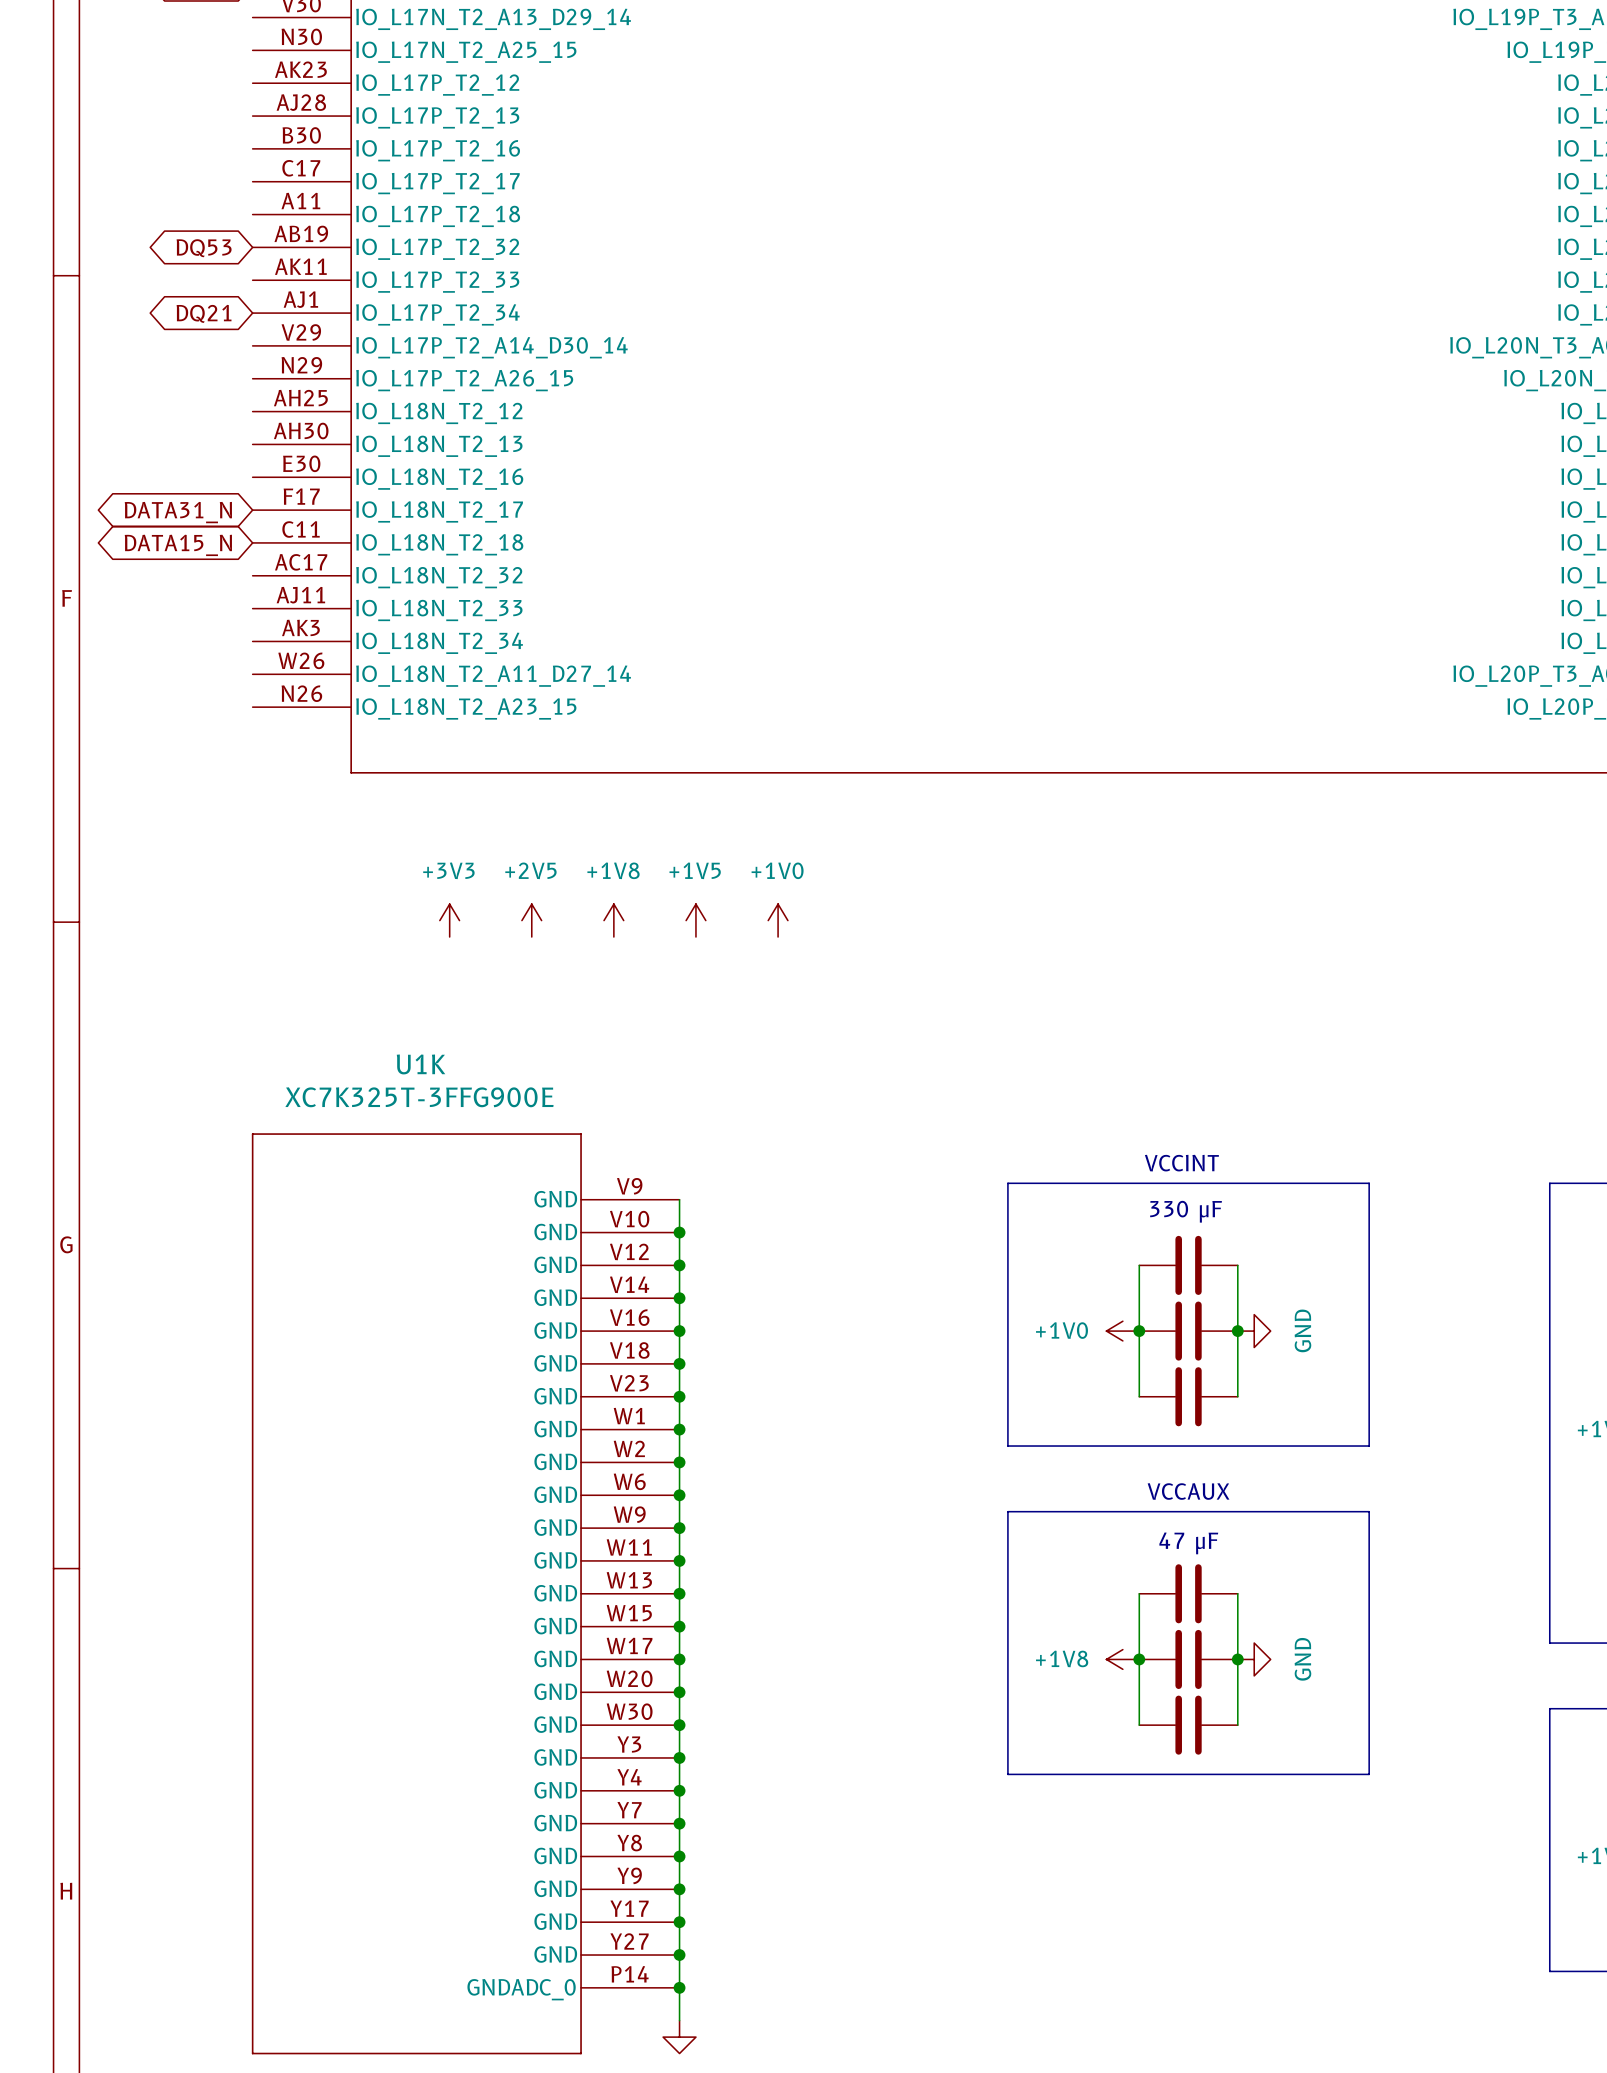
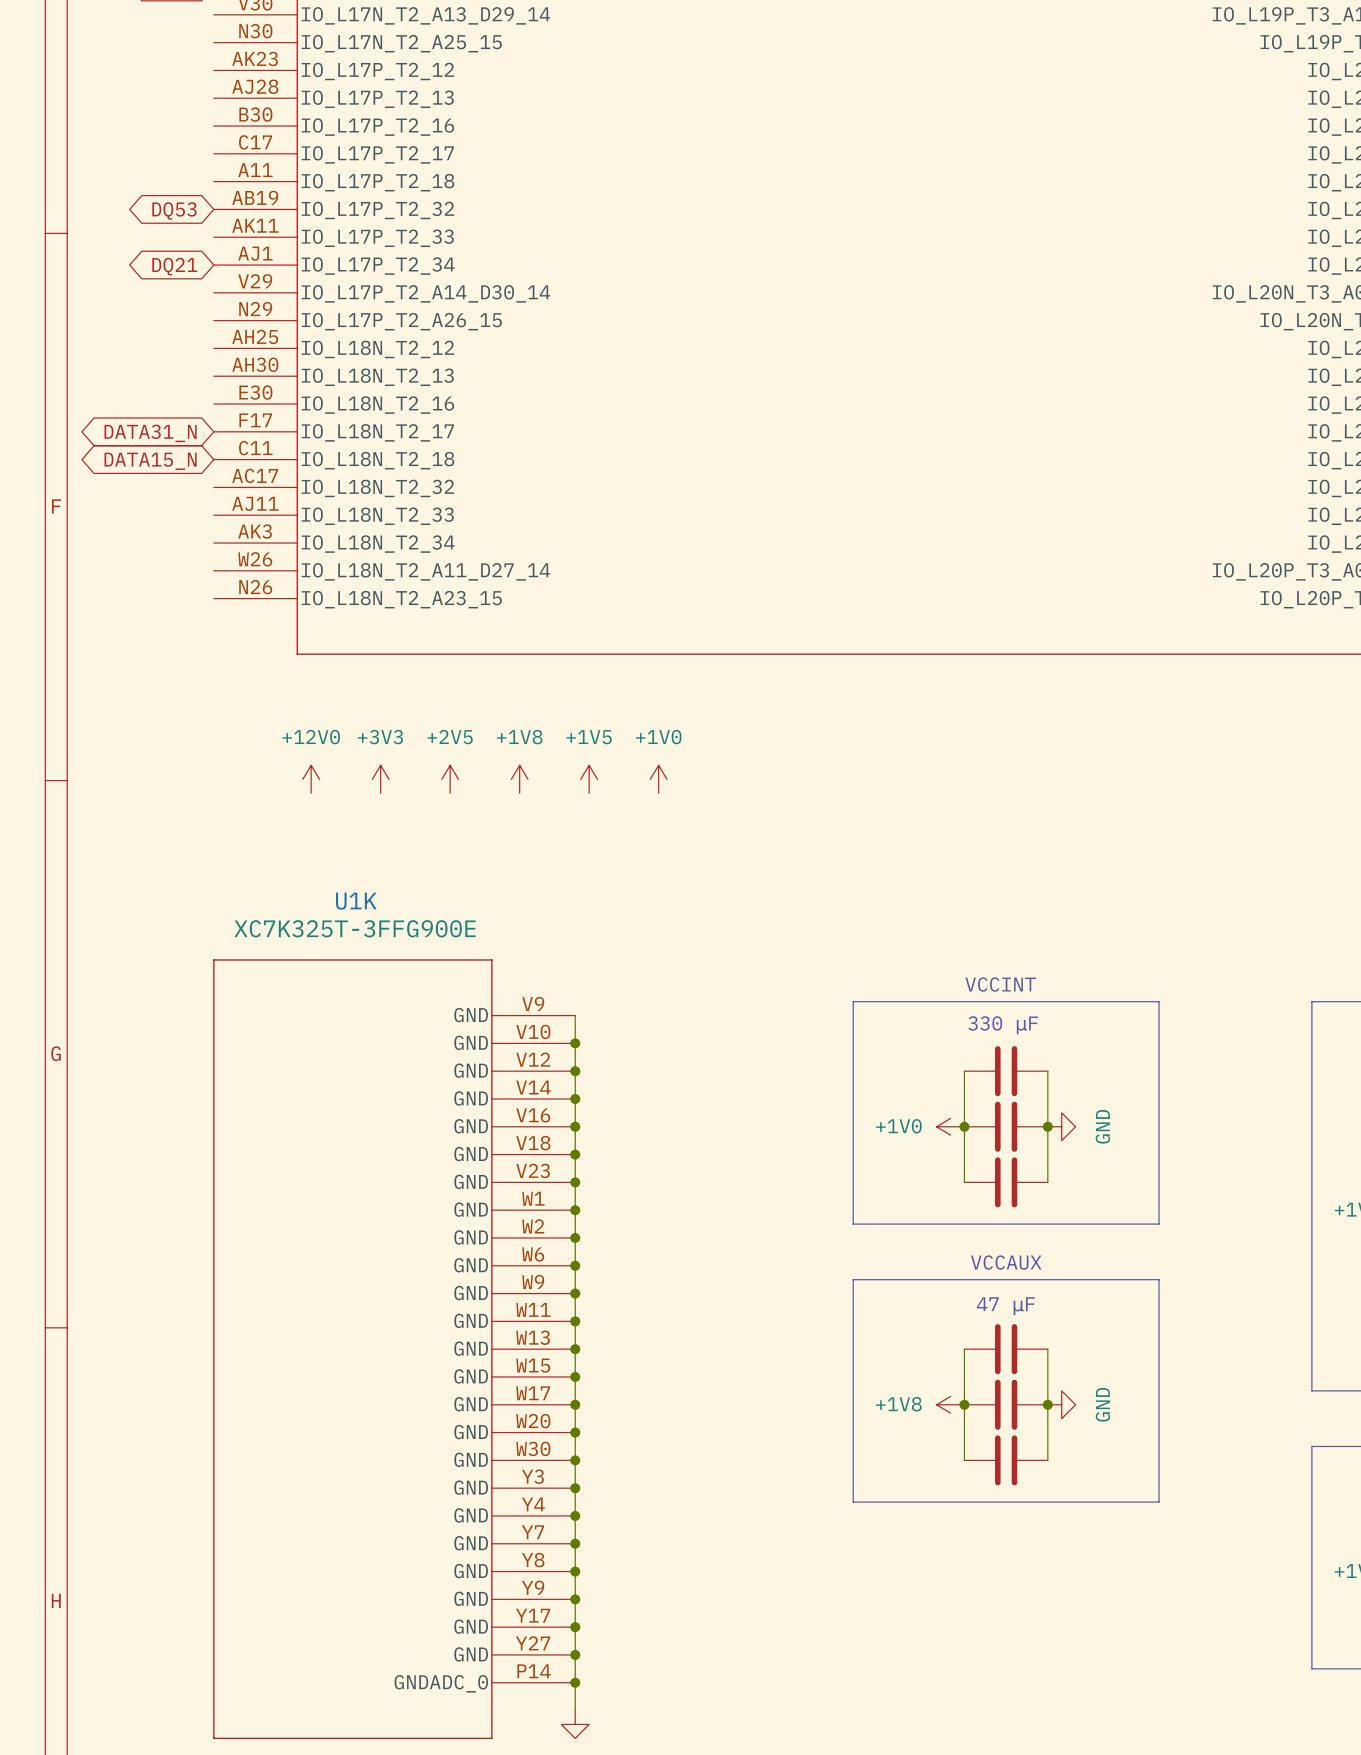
power symbol: none -> +12V0 (311, 779)

